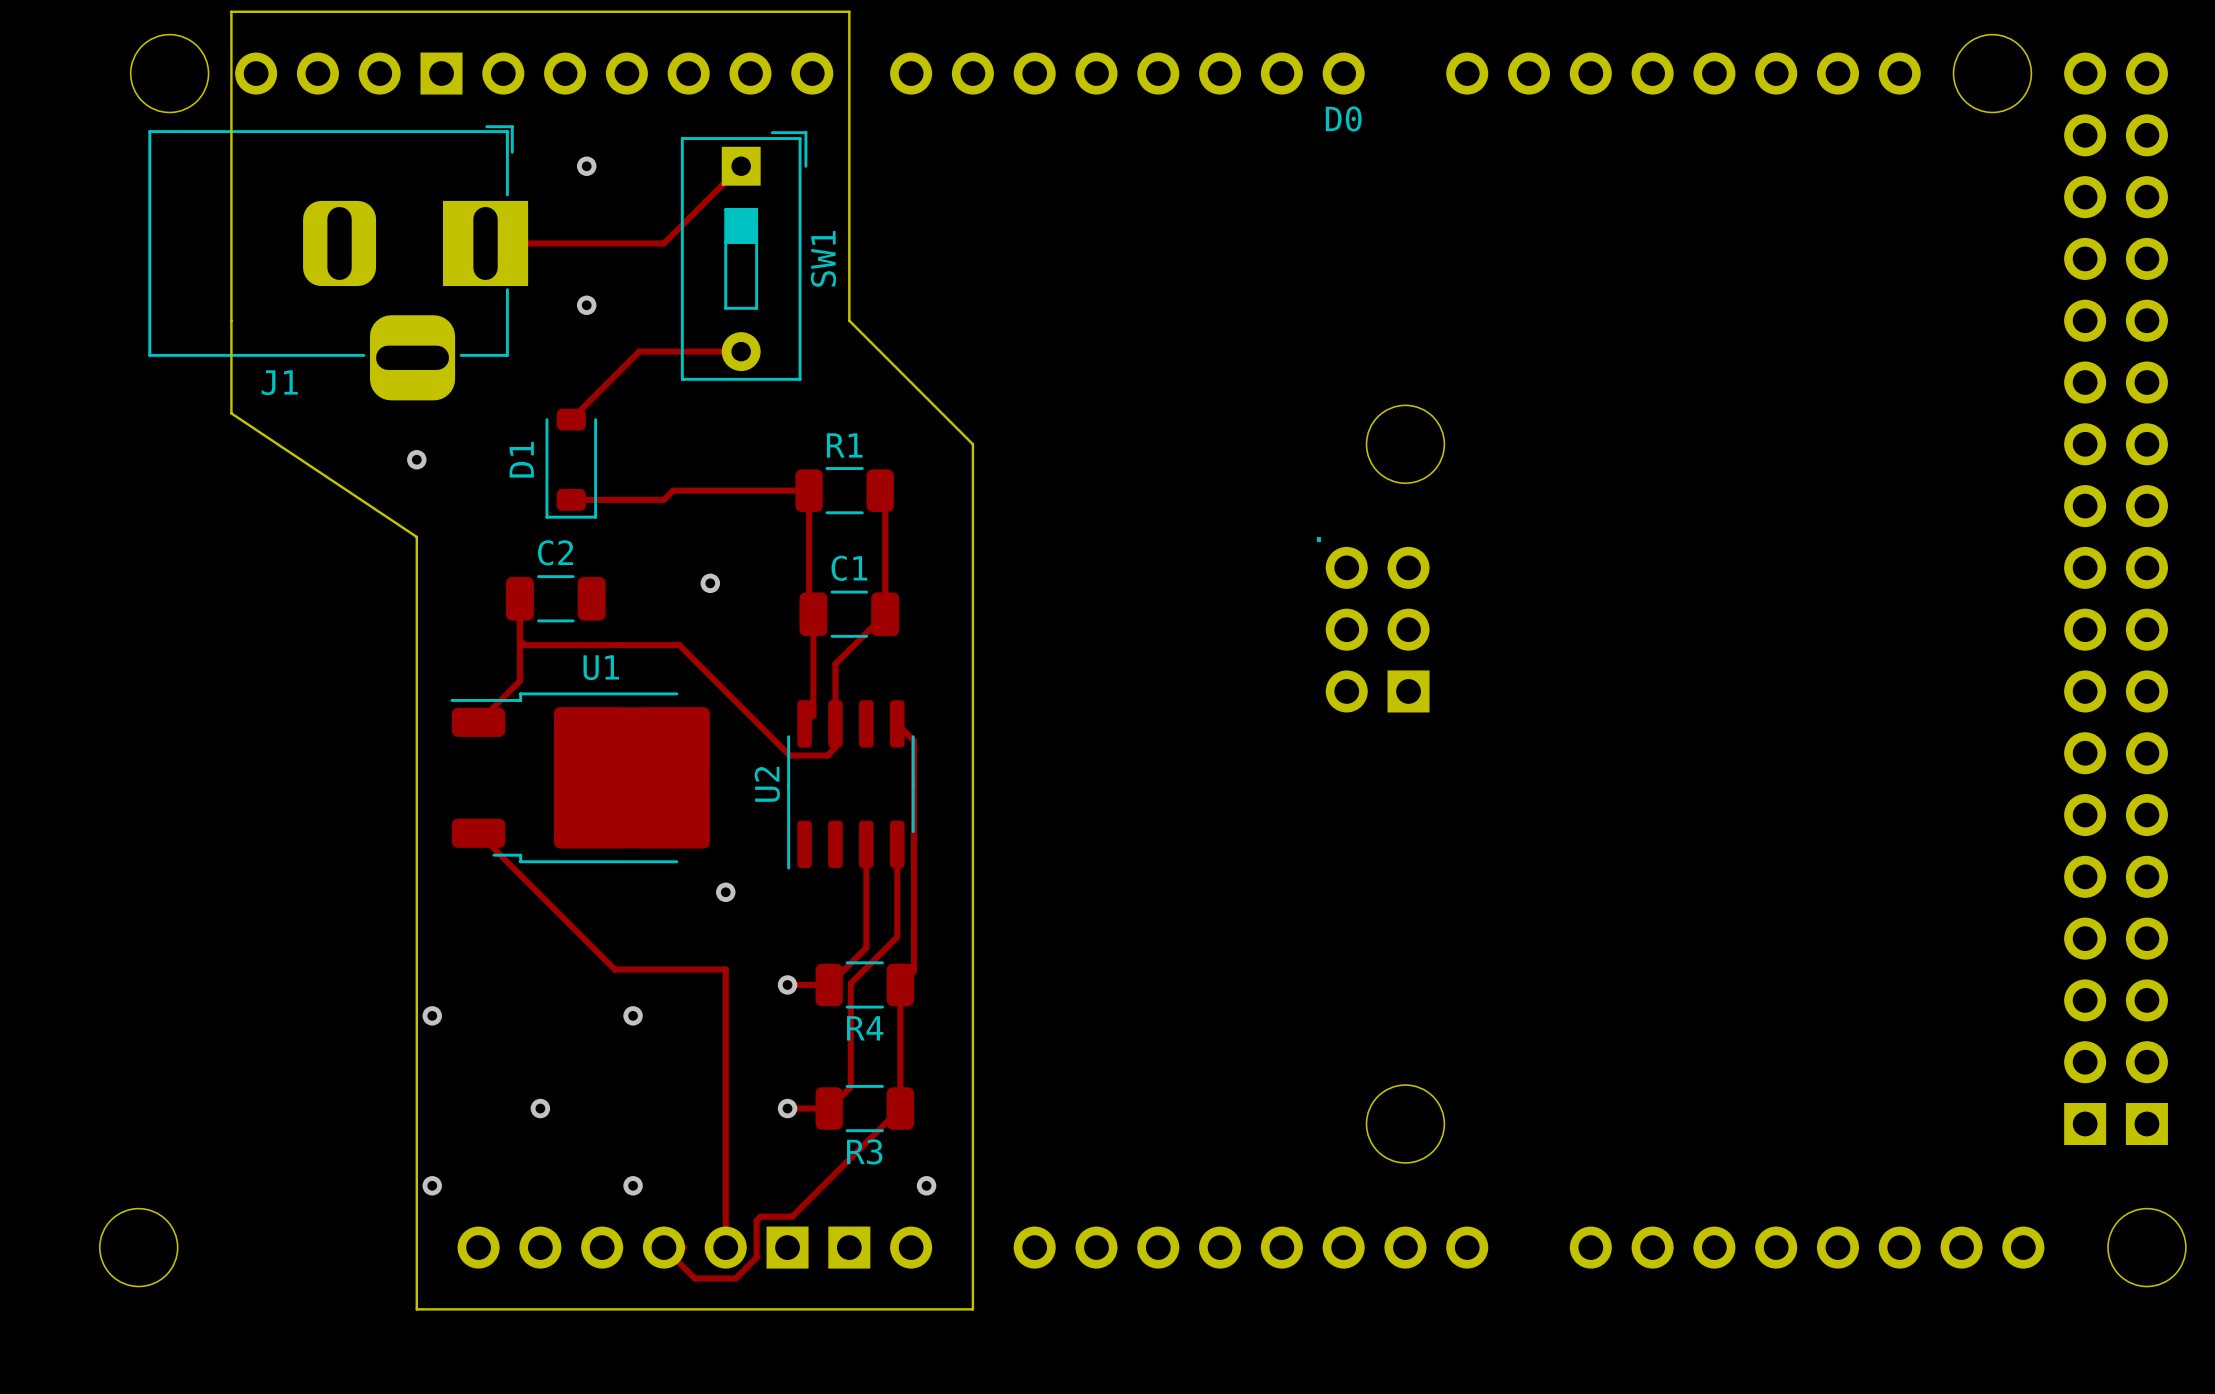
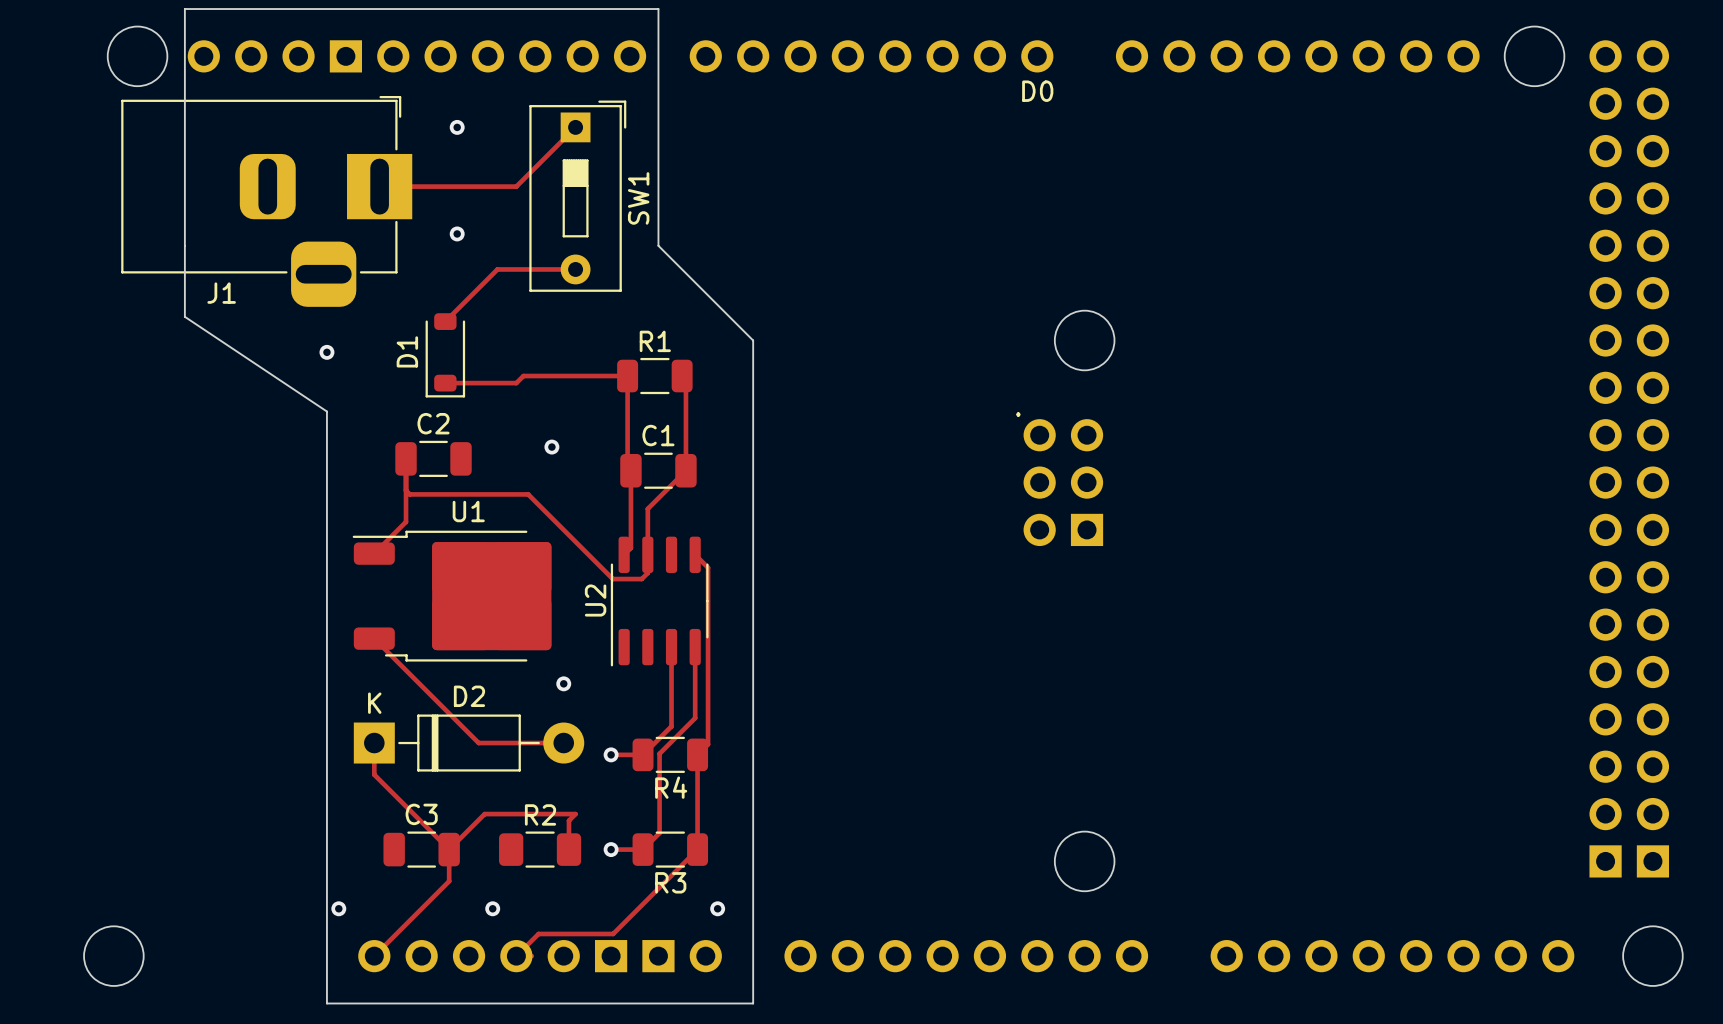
track: none -> (374, 743) (374, 774) (449, 849)
D2: none -> (469, 743)
track: (725, 969) (725, 1247) -> none
via: (432, 1015) -> none
via: (633, 1015) -> none
via: (540, 1108) -> none
C3: none -> (421, 849)
track: none -> (449, 849) (449, 881) (374, 956)
track: none -> (449, 849) (484, 814) (575, 814) (568, 820) (568, 849)
R2: none -> (540, 849)
track: (792, 1216) (760, 1216) (756, 1220) (756, 1257) (735, 1278) (694, 1278) (663, 1247) -> (614, 932) (538, 933) (516, 956)

